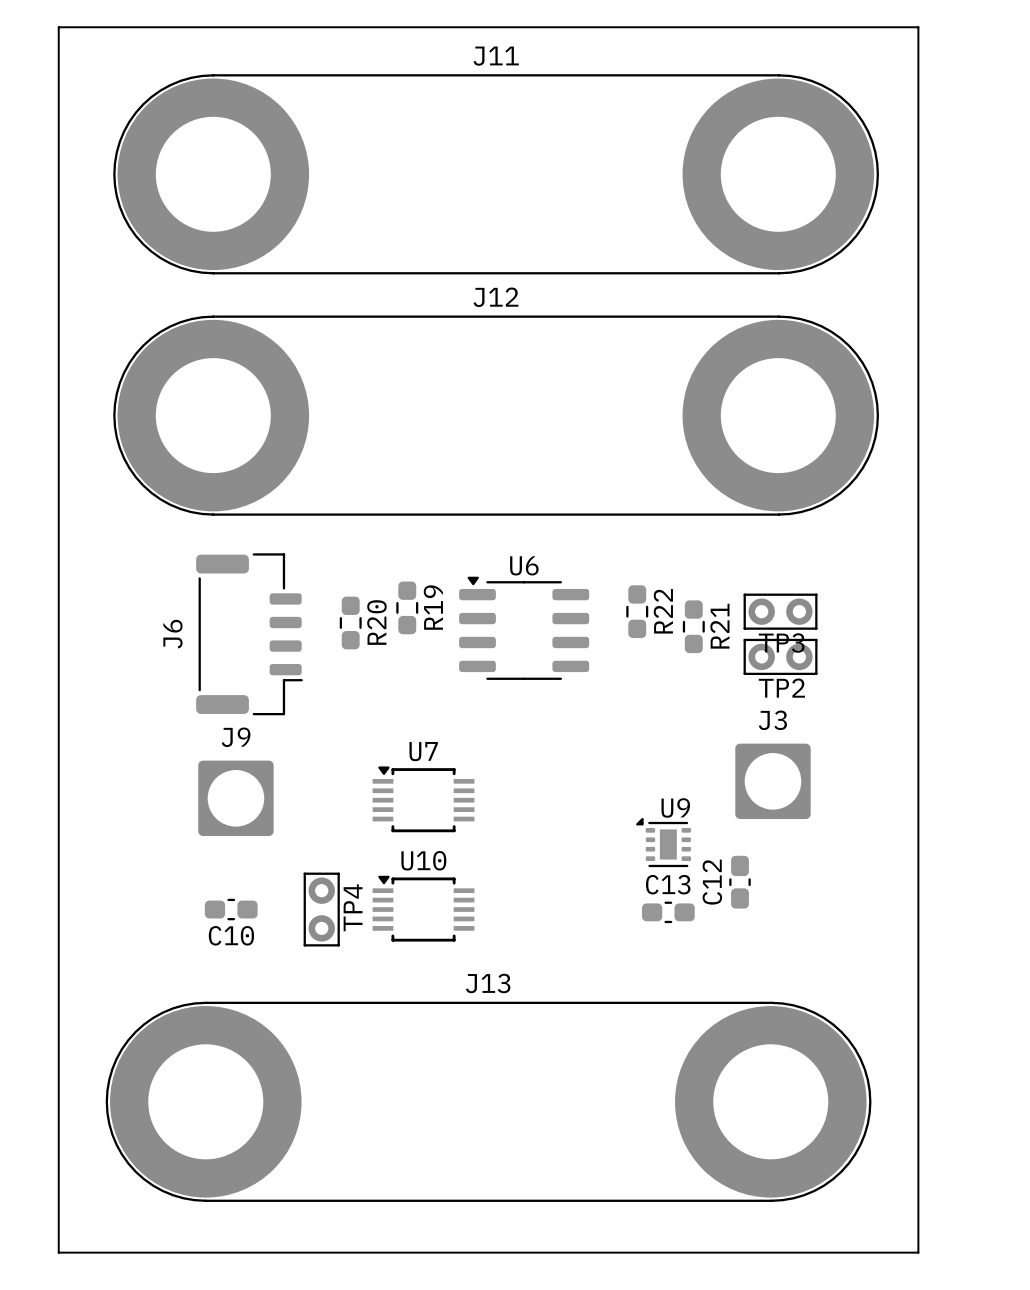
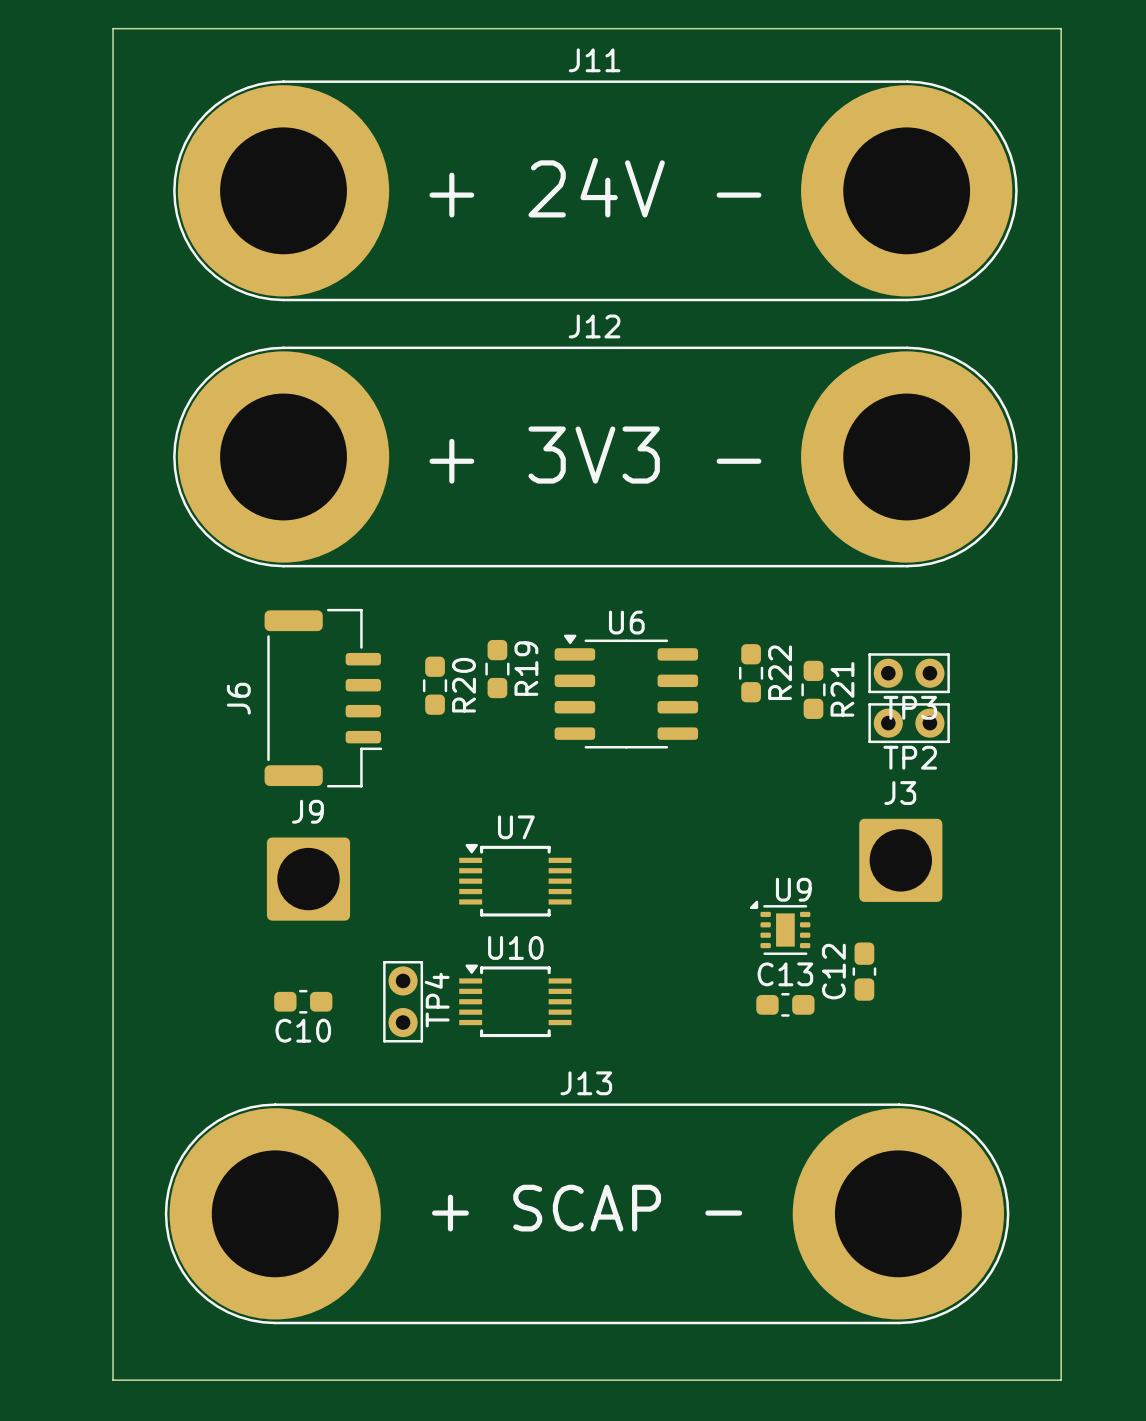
text: none -> + 24V - (595, 187)
text: none -> + 3V3 - (595, 455)
text: none -> + SCAP - (587, 1208)

